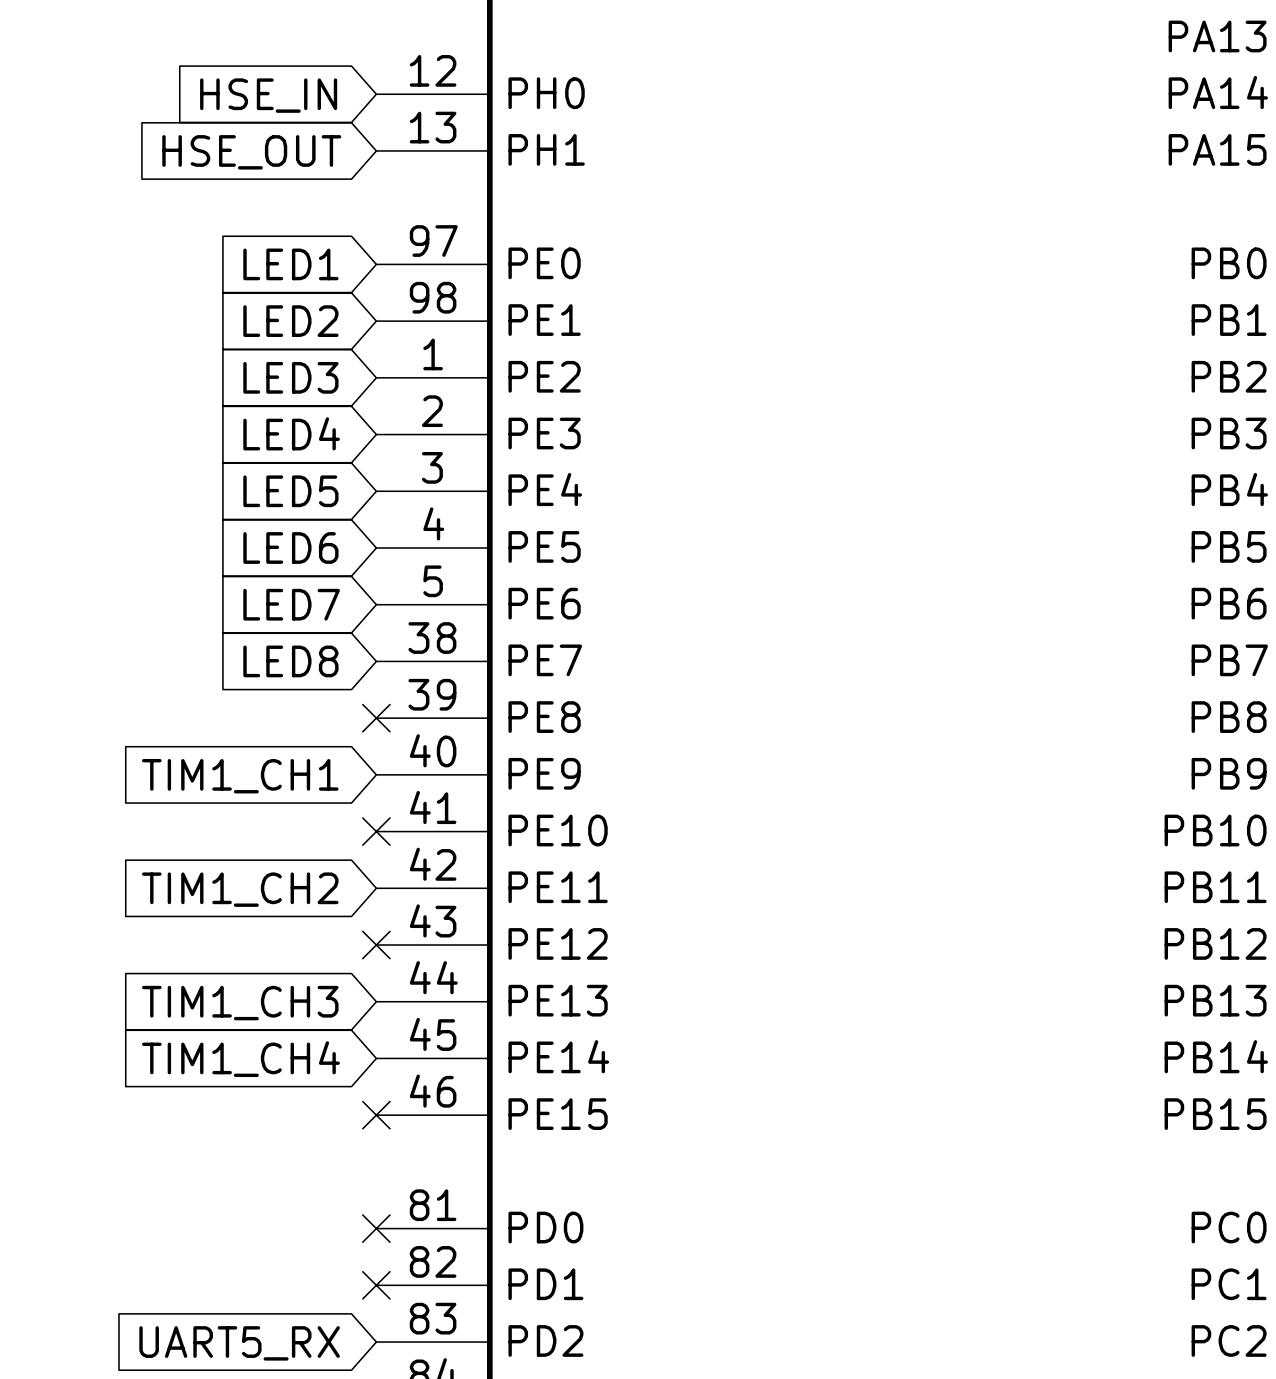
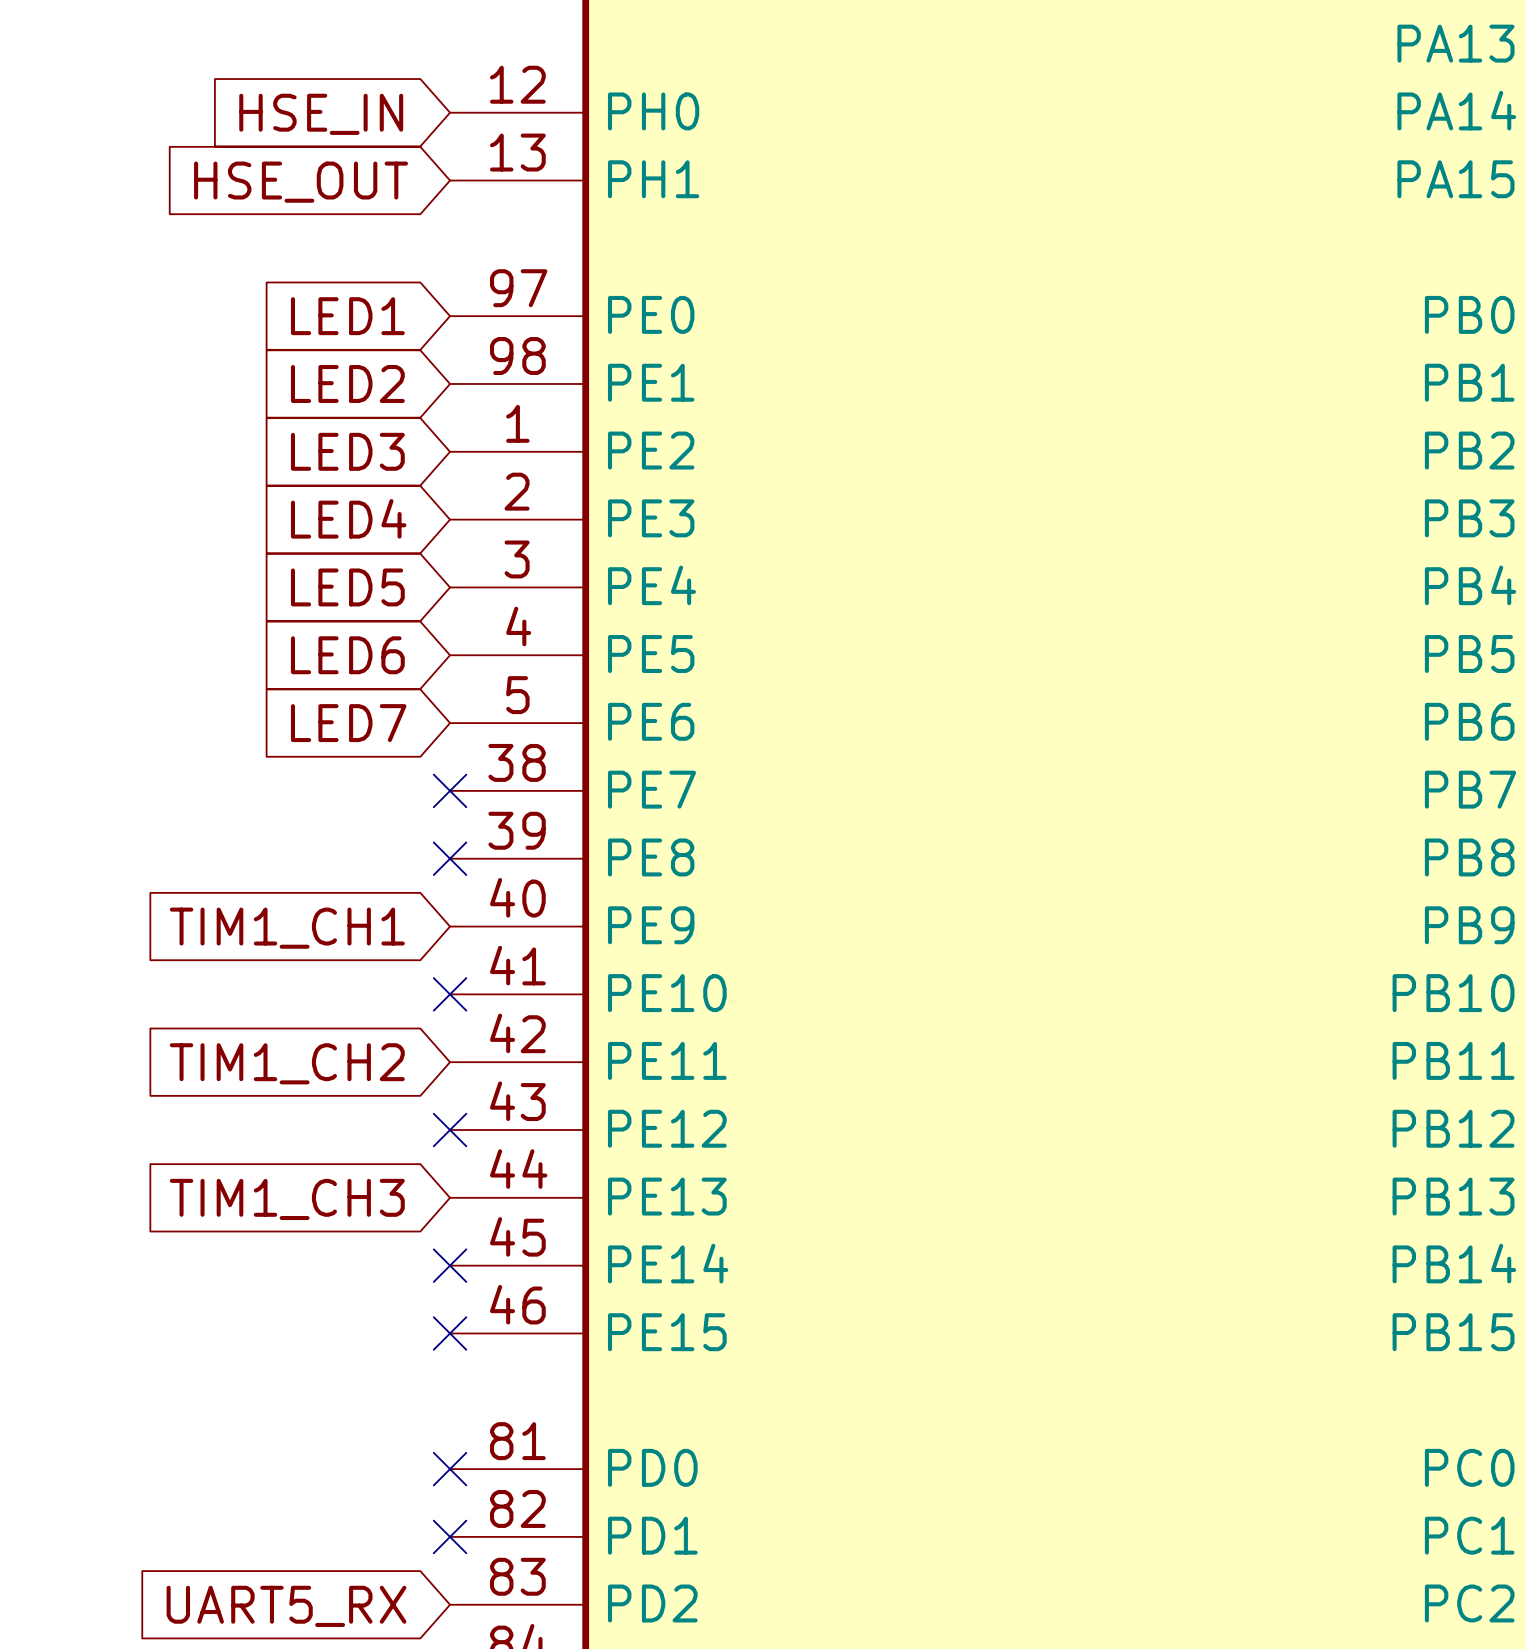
global label: LED8 (290, 661) -> none
no-connect mark: none -> (450, 790)
no-connect mark: none -> (450, 1265)
global label: TIM1_CH4 (240, 1059) -> none

